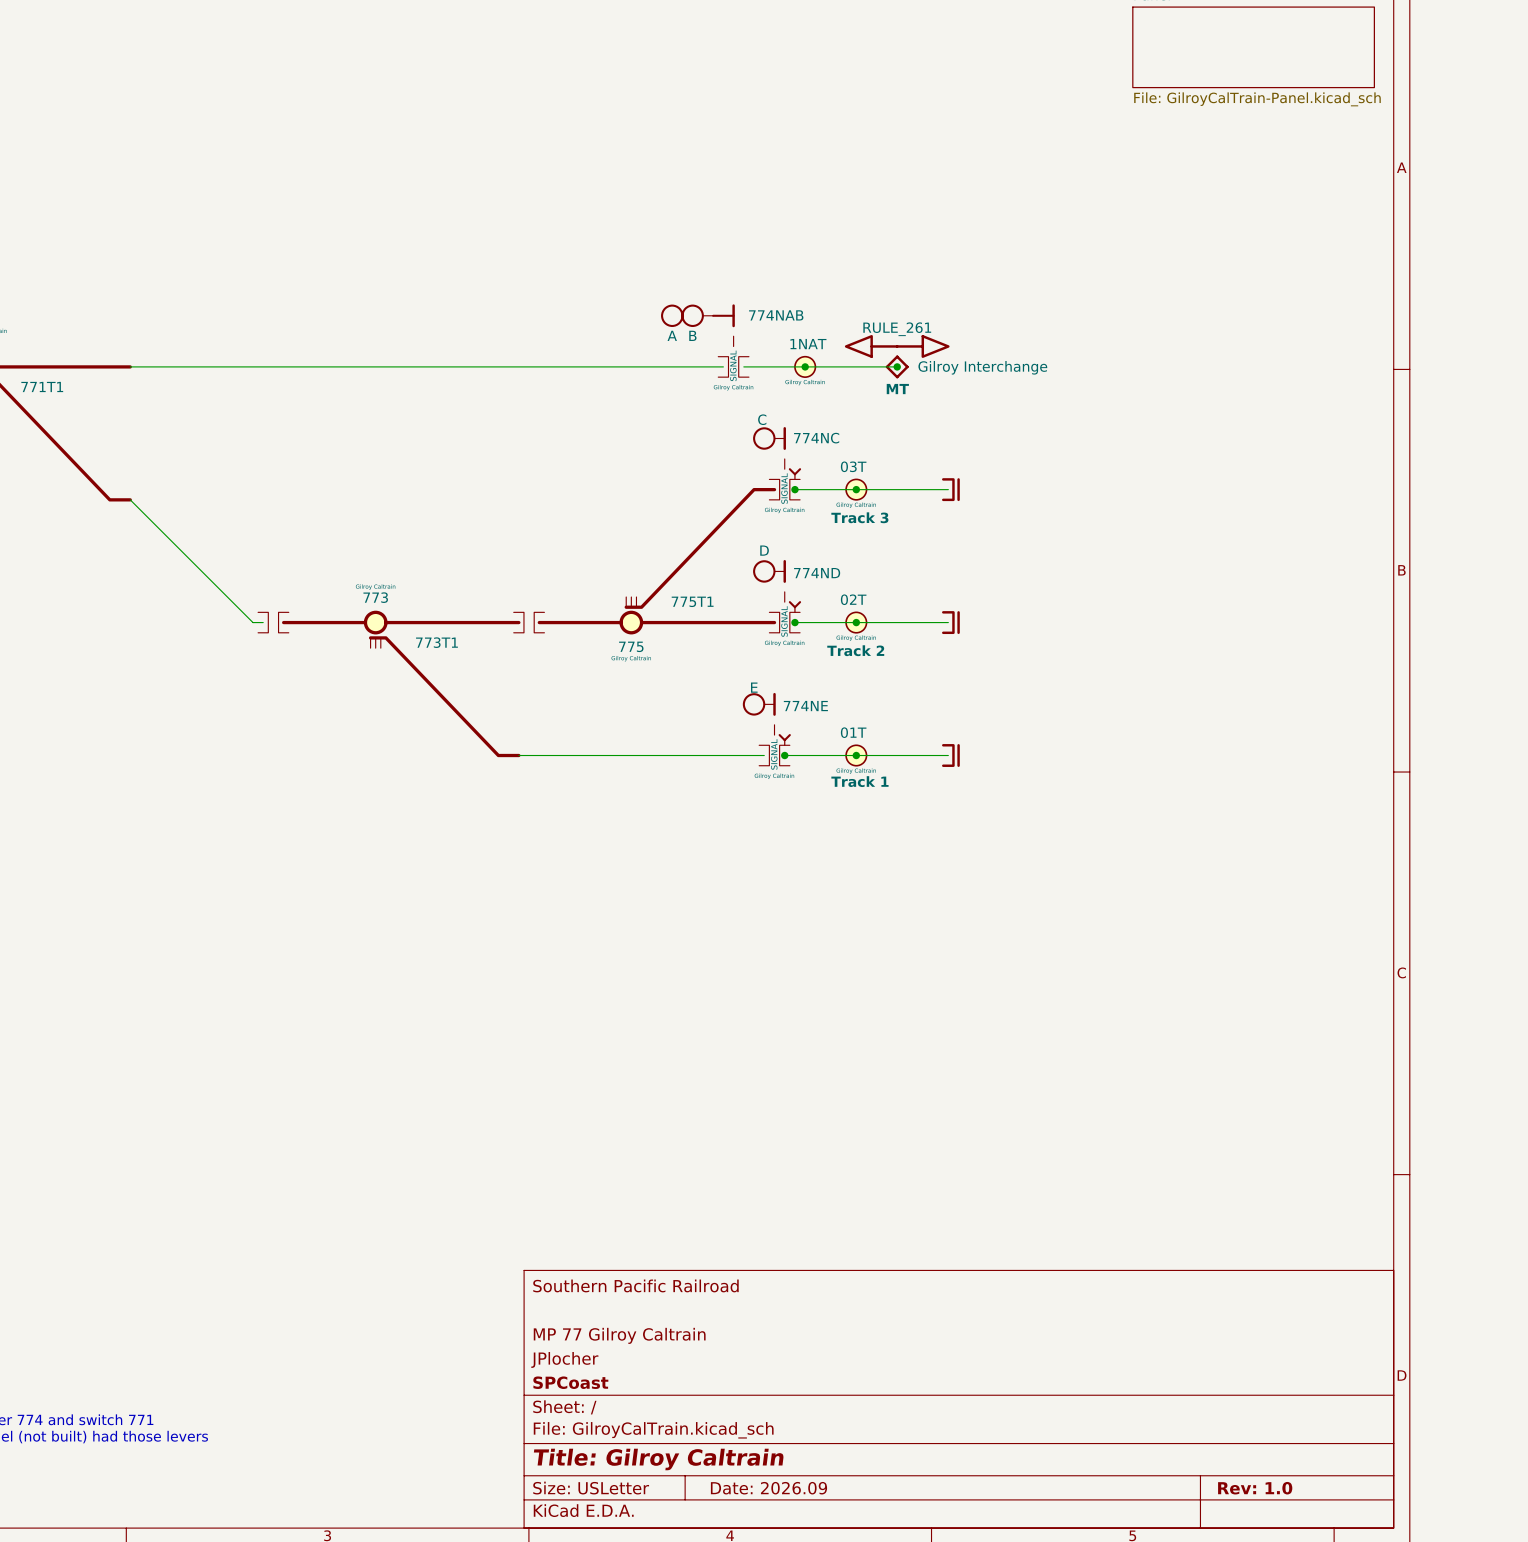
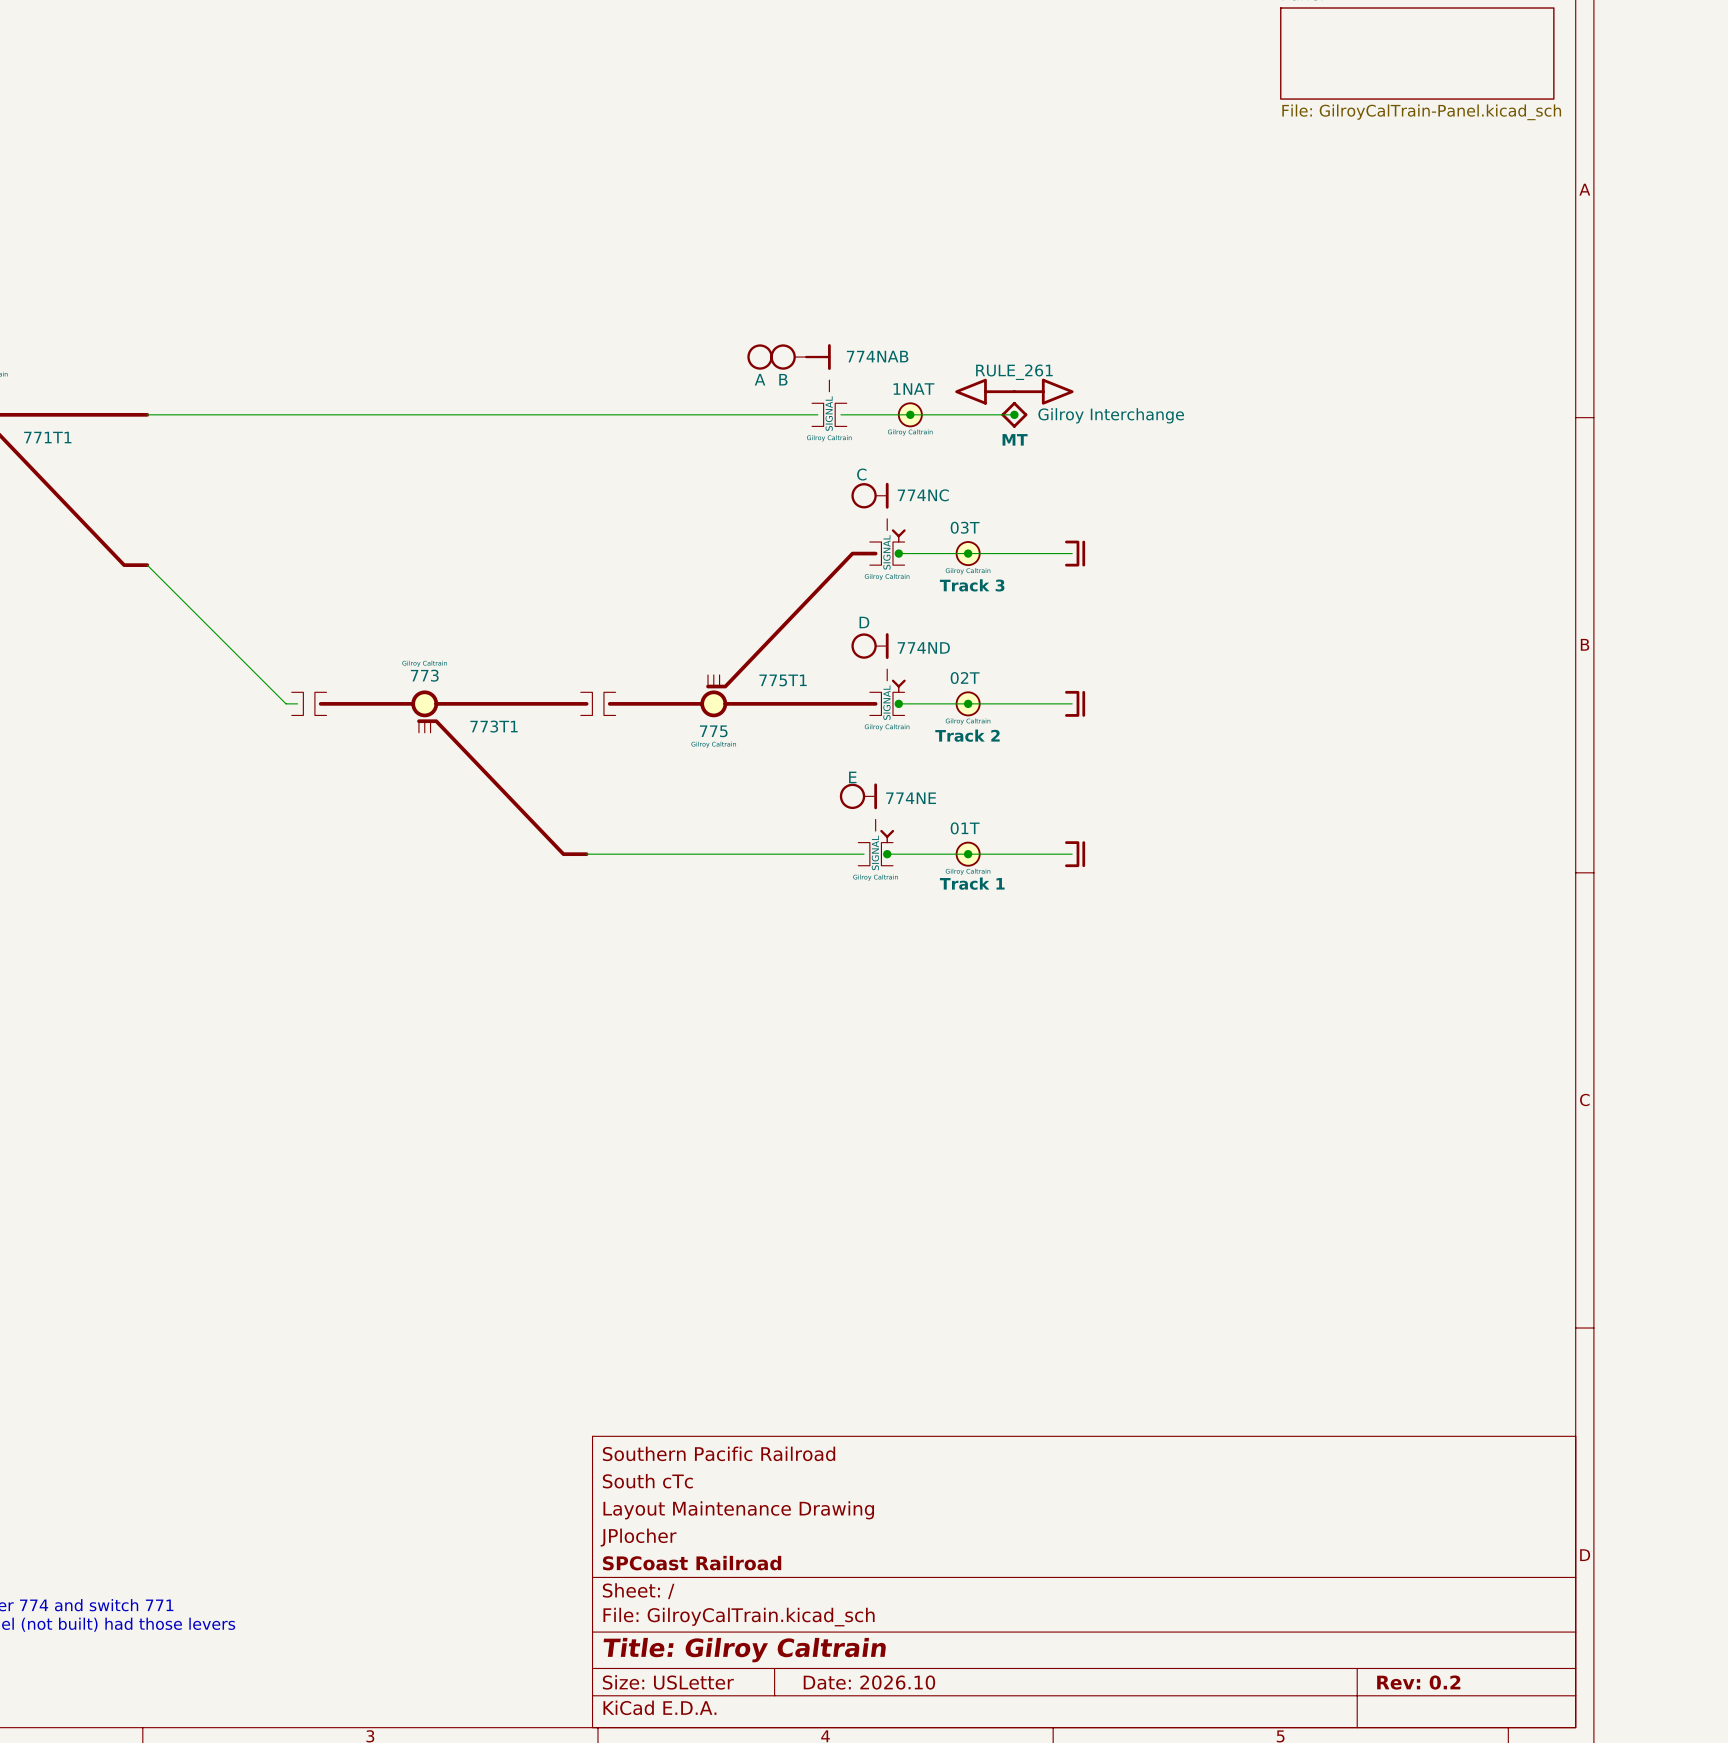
title block: none -> South cTc (647, 1481)
title block: MP 77 Gilroy Caltrain (619, 1335) -> Layout Maintenance Drawing (738, 1510)
title block: SPCoast (570, 1382) -> SPCoast Railroad (692, 1563)
title block: Date: 2026.09 (768, 1488) -> Date: 2026.10 (869, 1682)
title block: Rev: 1.0 (1255, 1488) -> Rev: 0.2 (1418, 1682)

